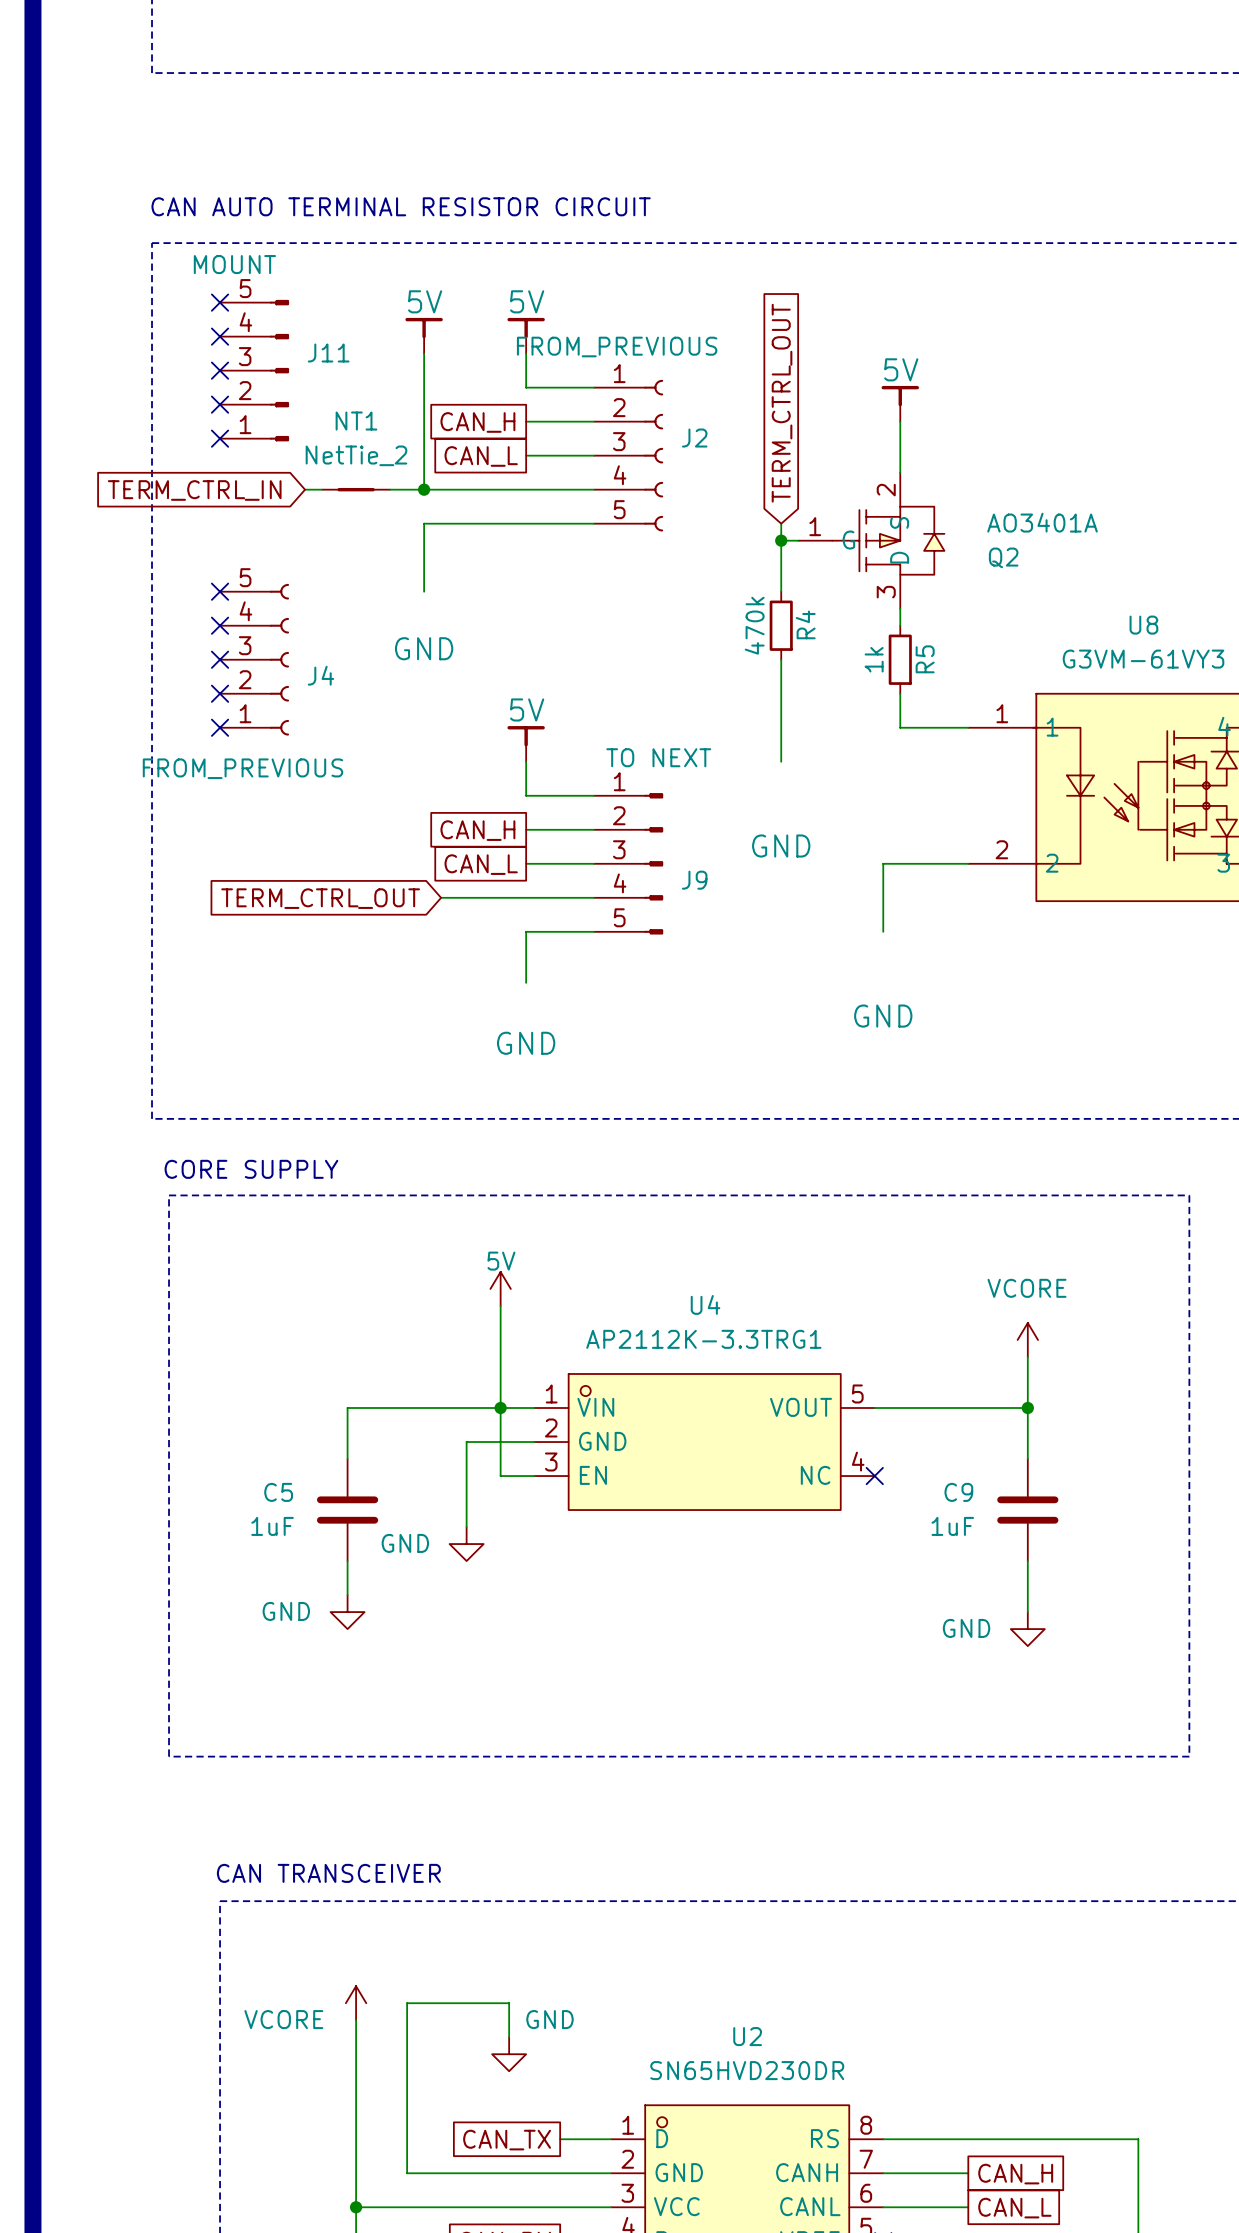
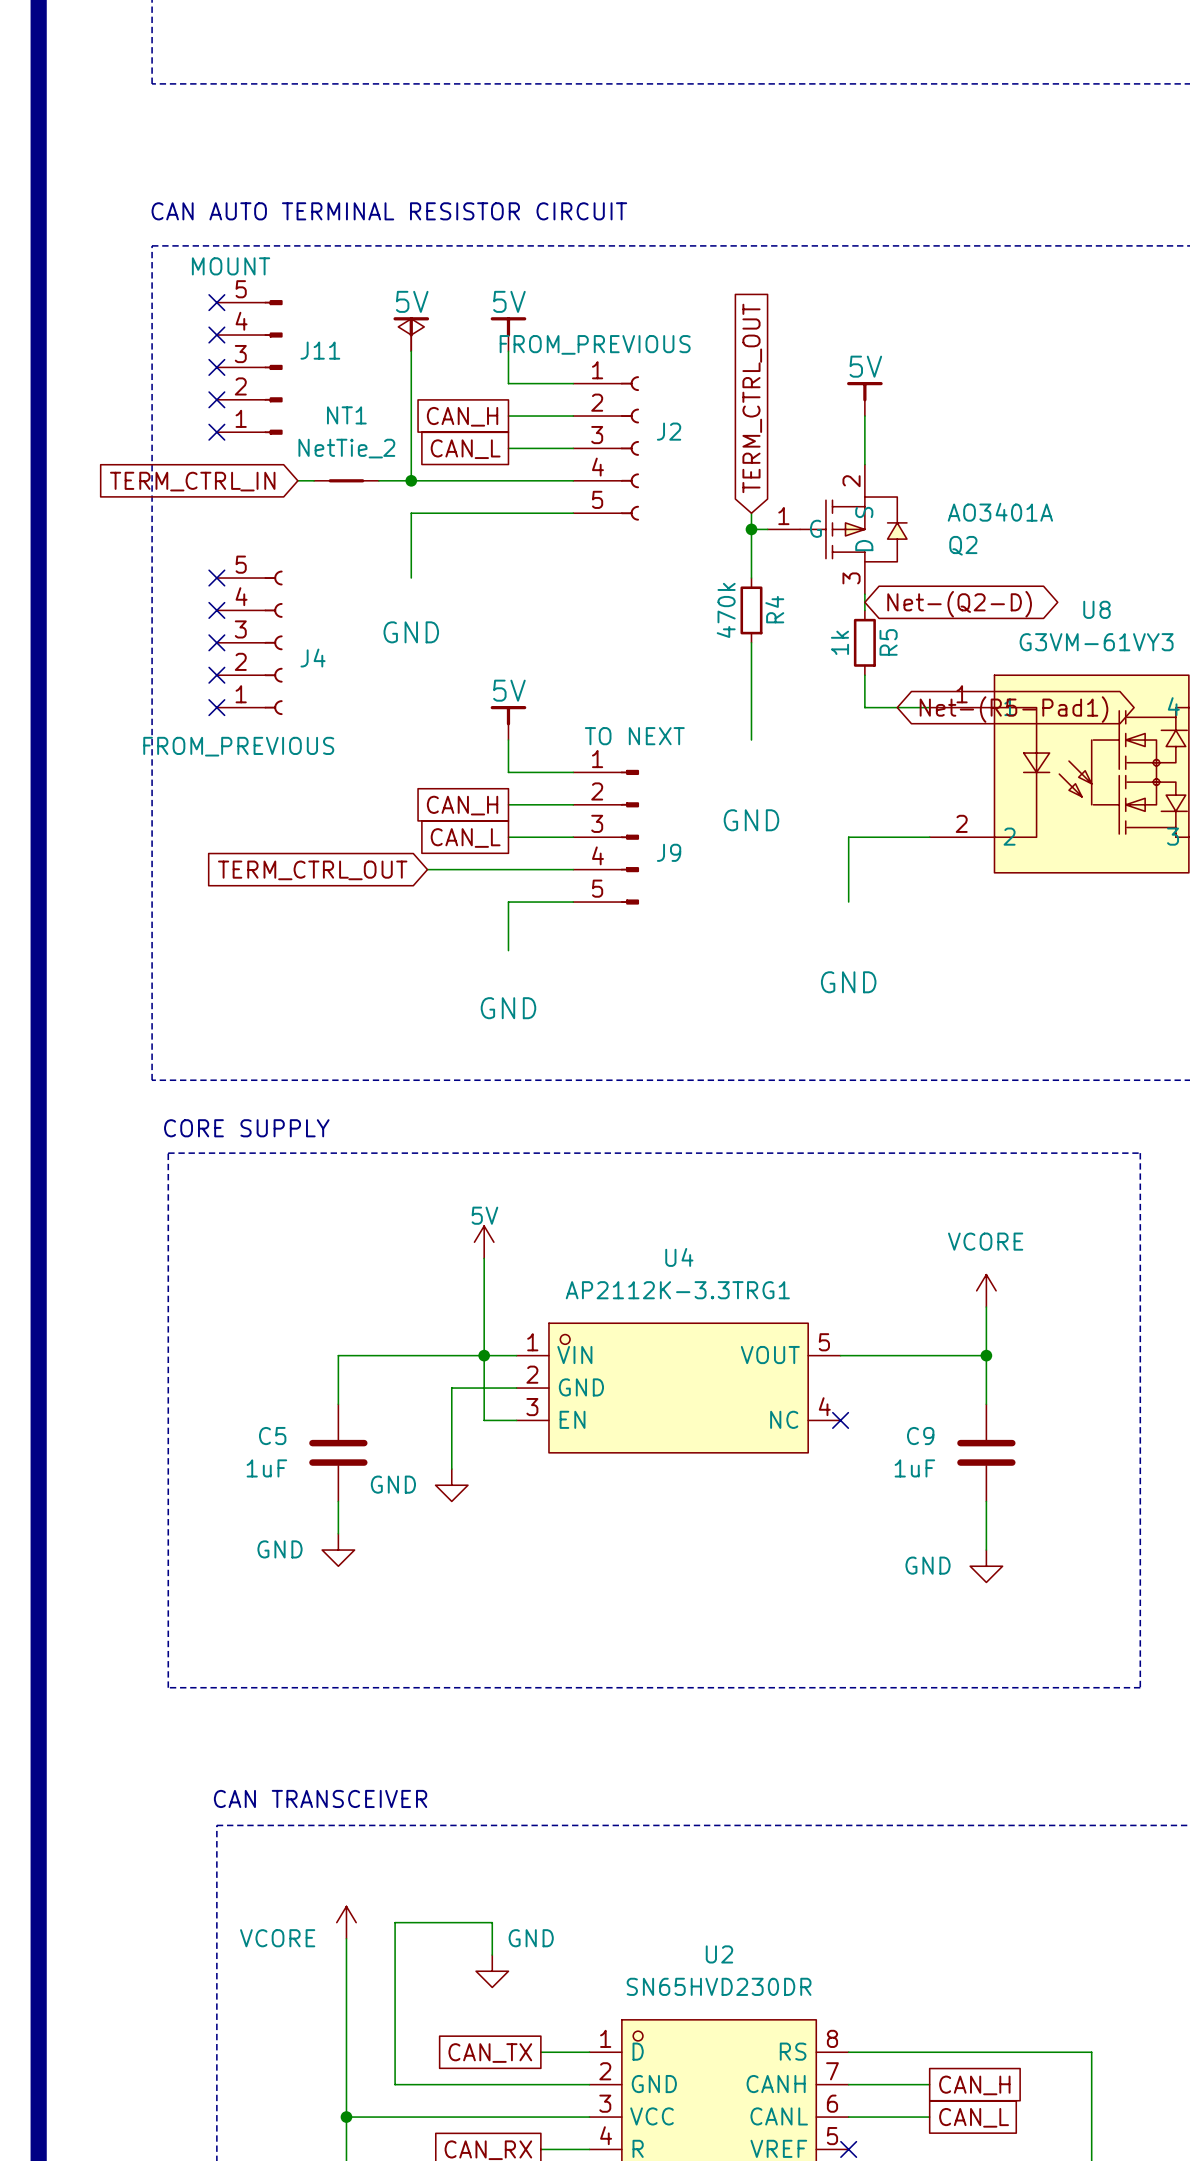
power symbol: none -> (411, 335)
global label: none -> Net-(Q2-D) (959, 604)
global label: none -> Net-(R5-Pad1) (1013, 709)

